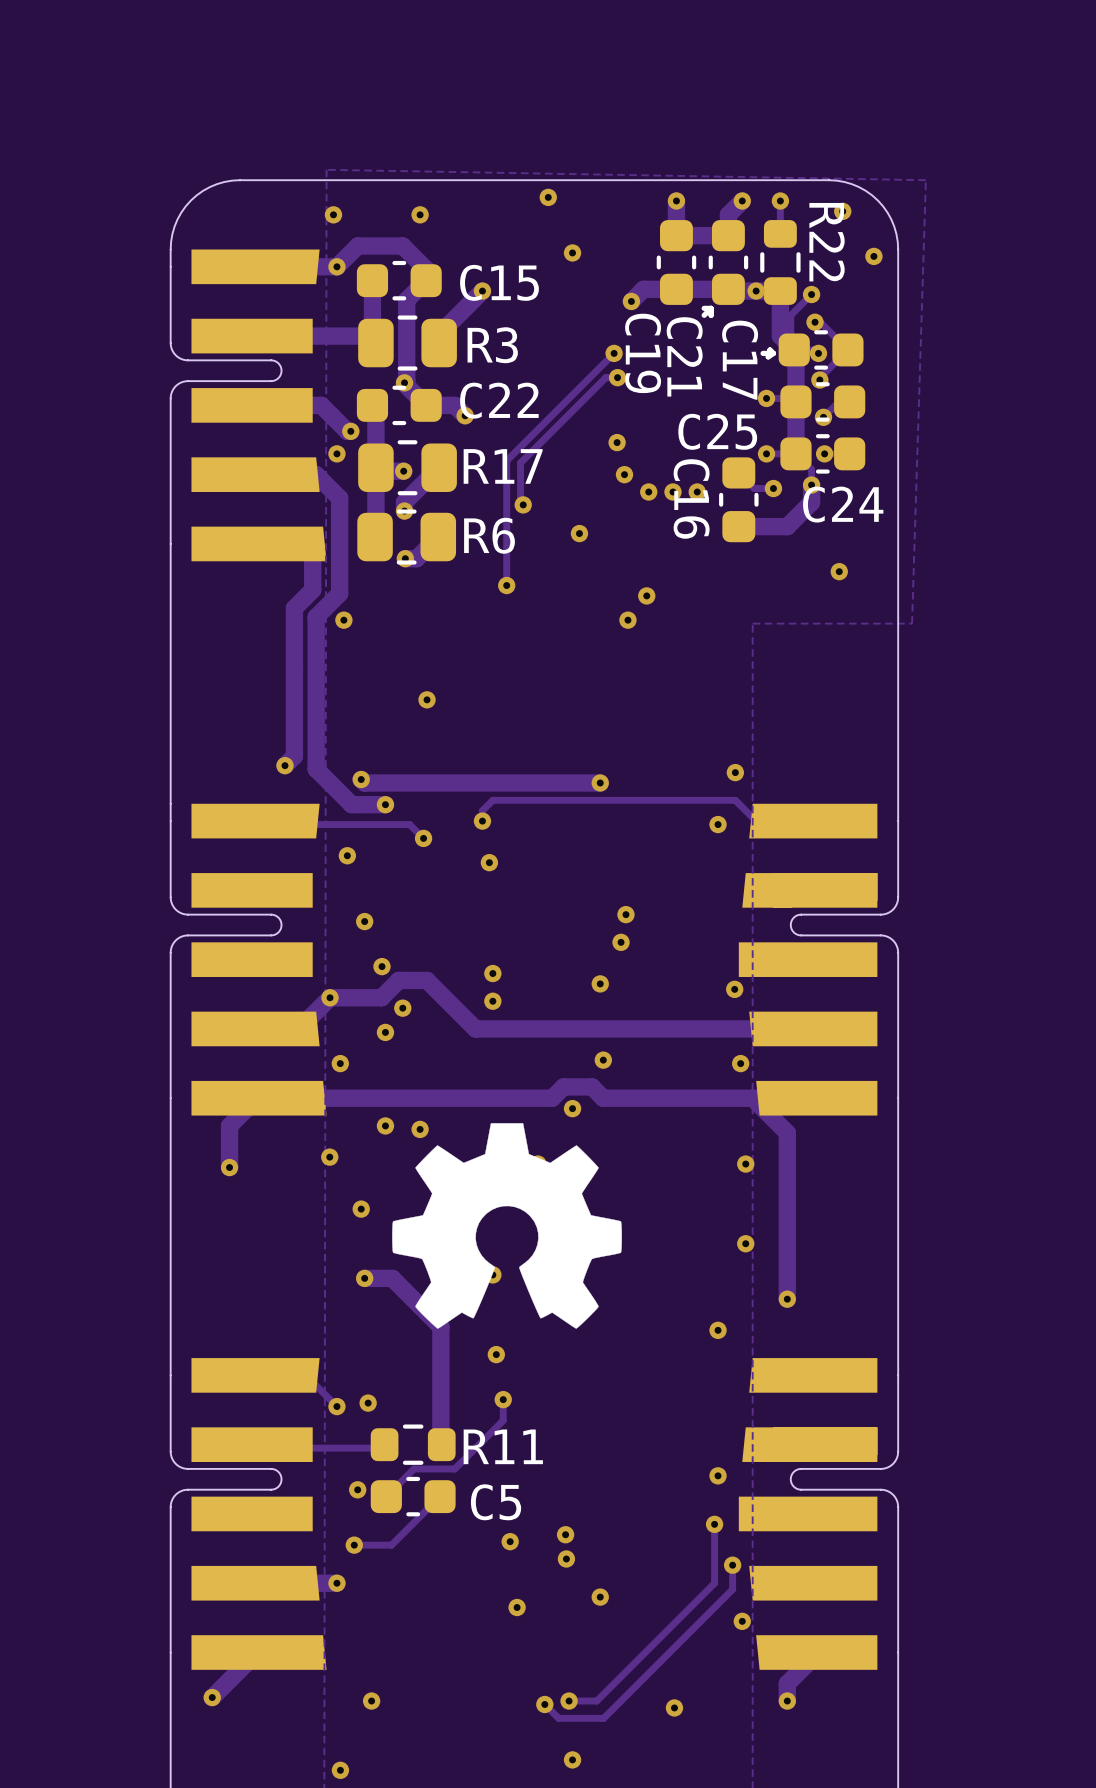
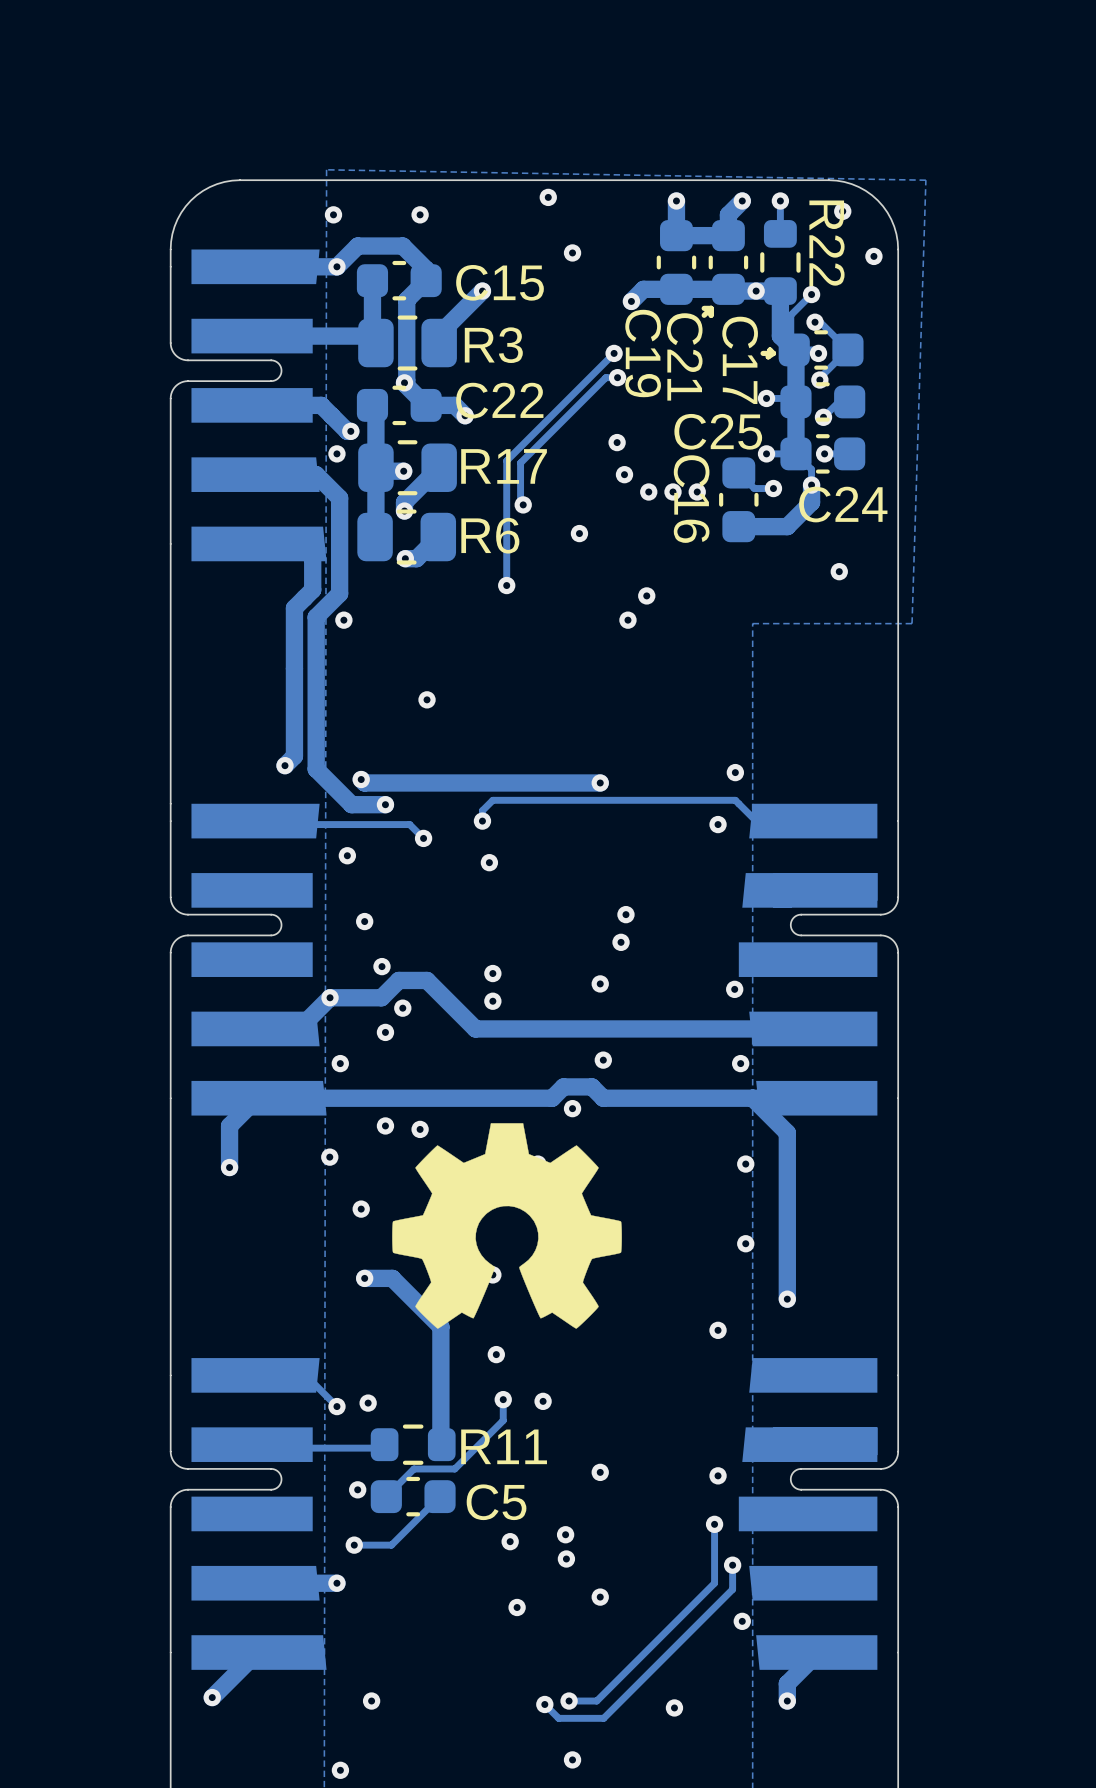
via: none -> (543, 1401)
via: none -> (600, 1472)

